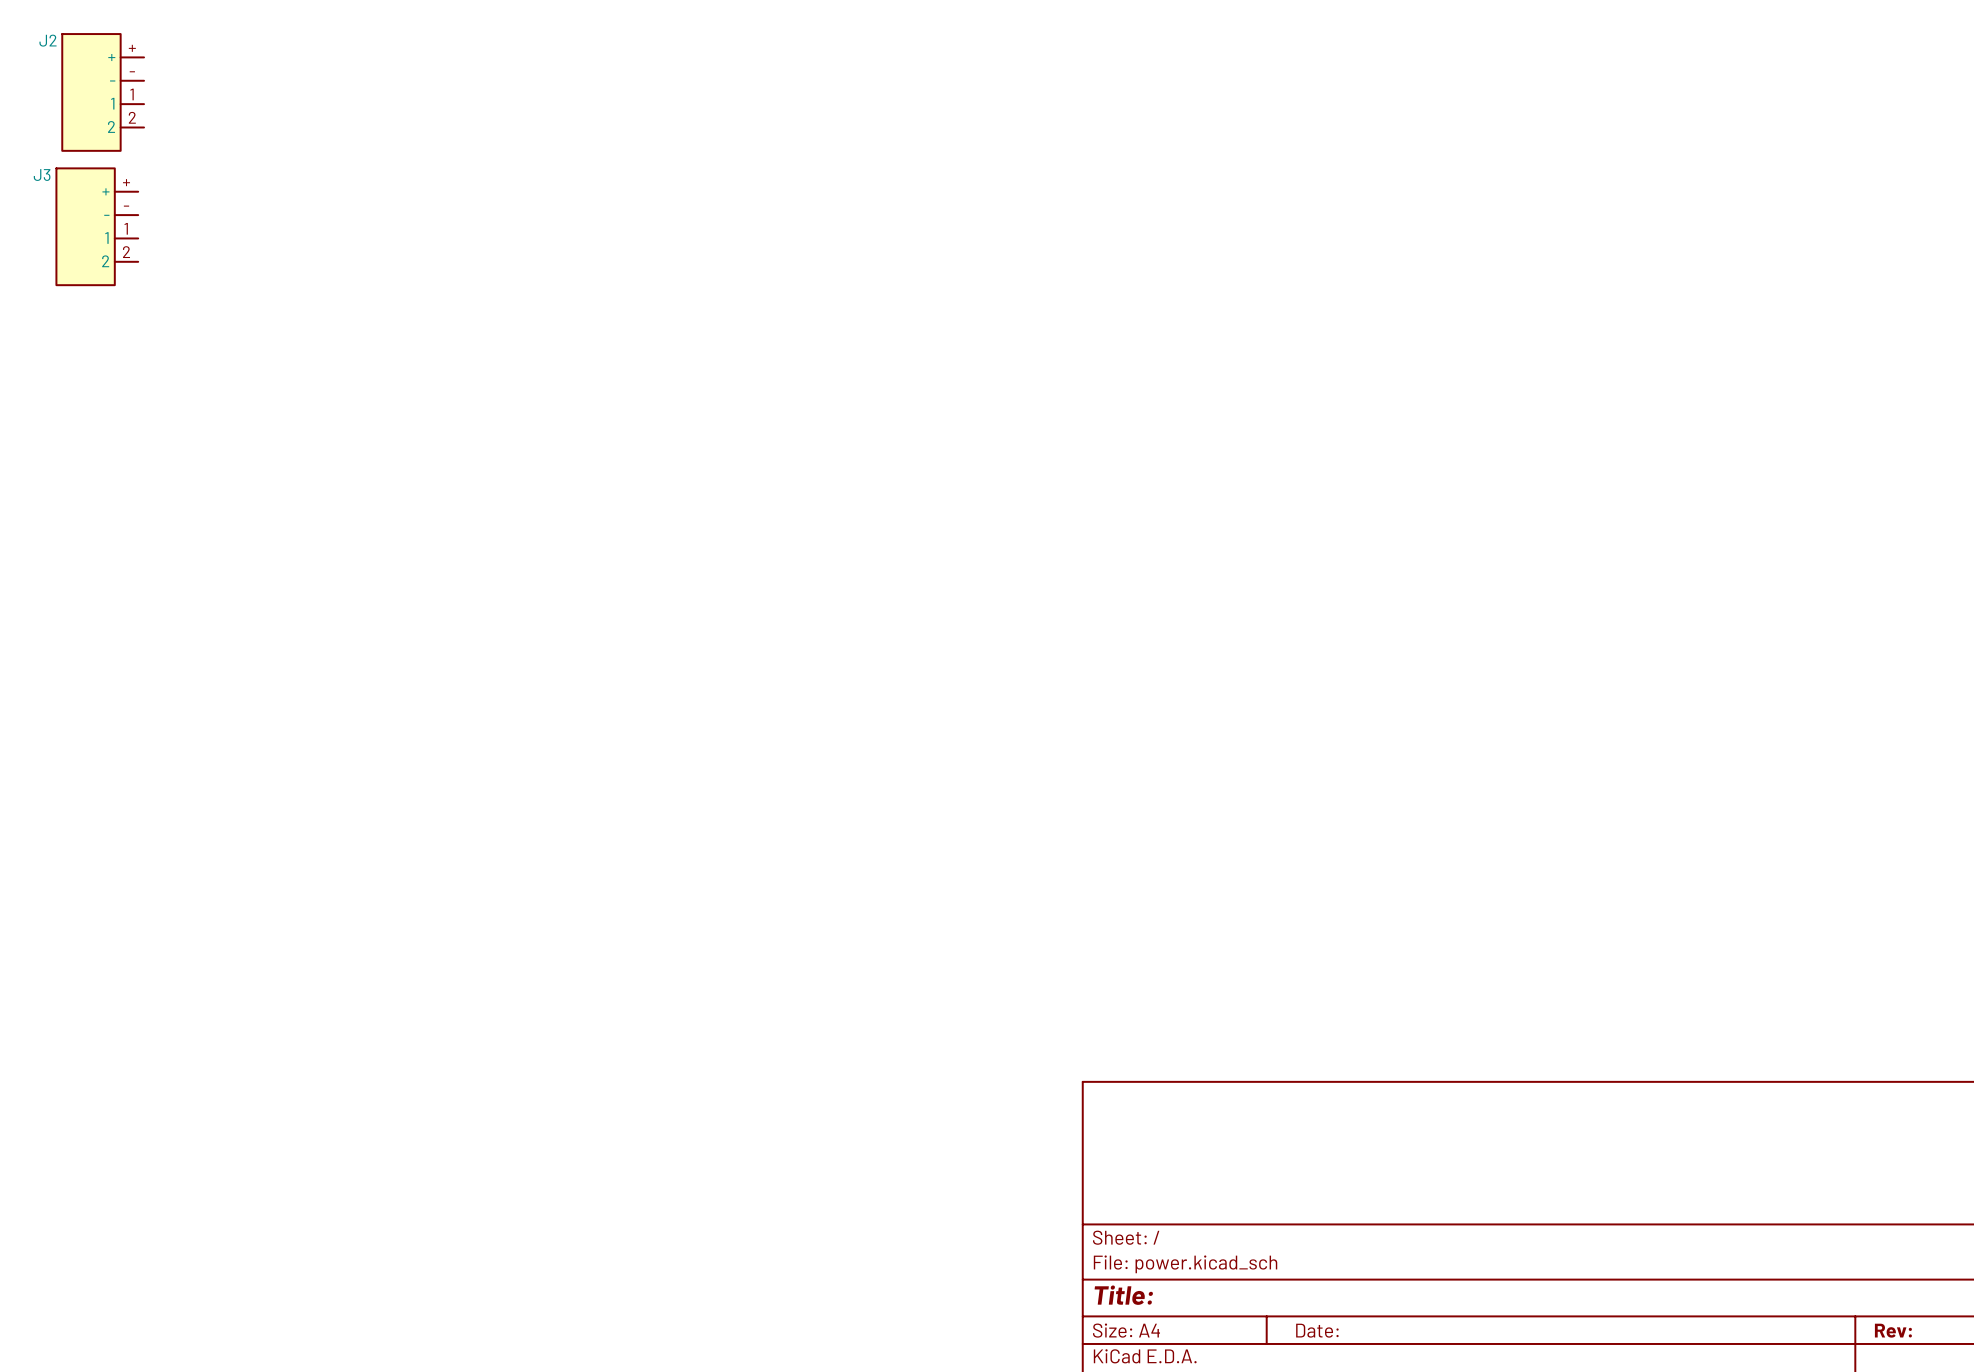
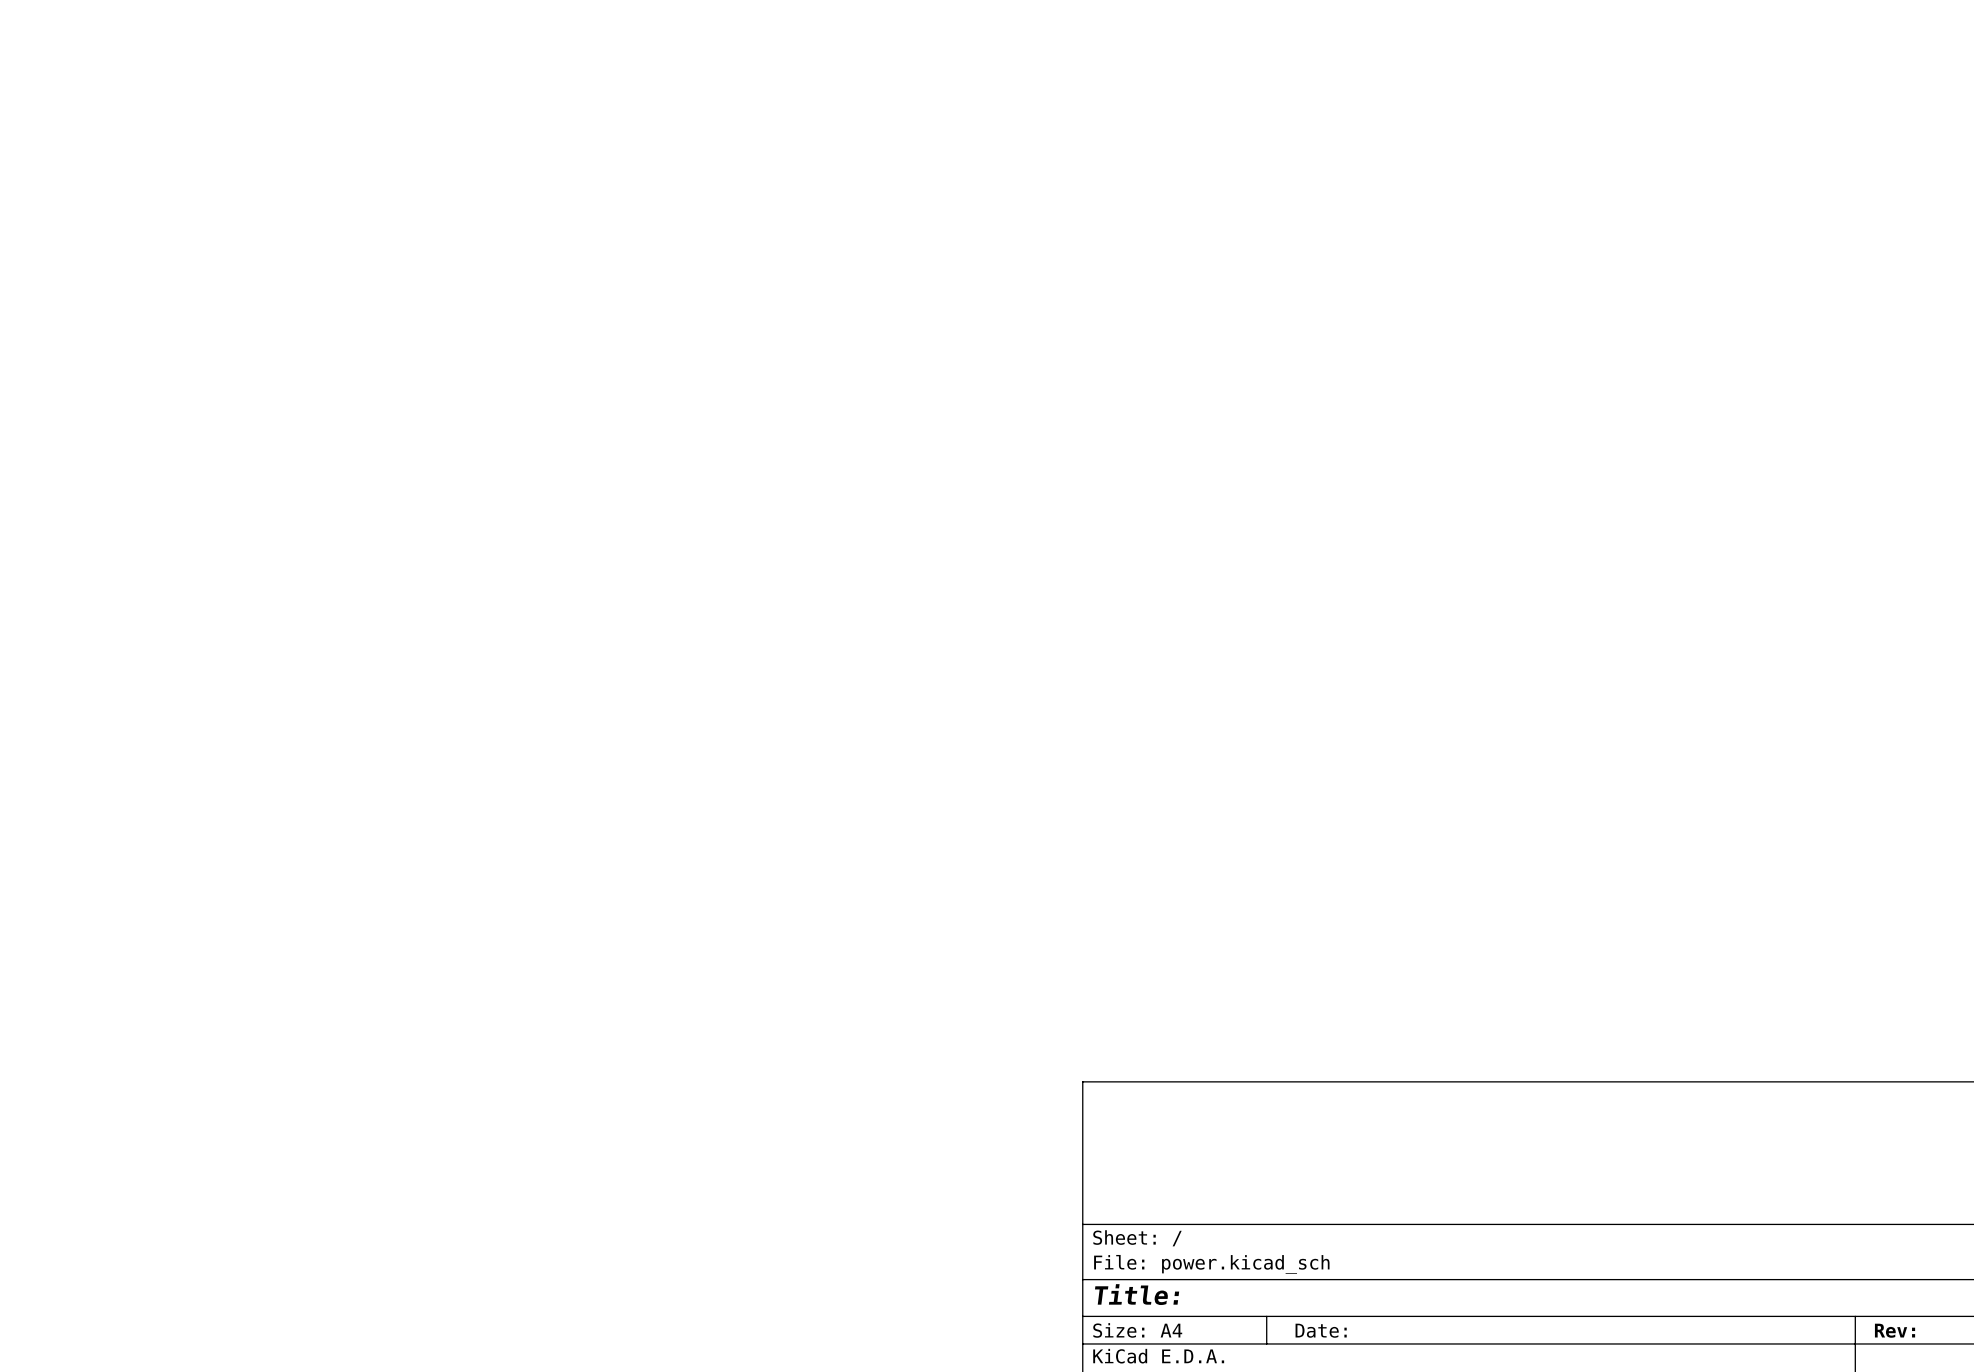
J2: (103, 92) -> none
J3: (97, 226) -> none

